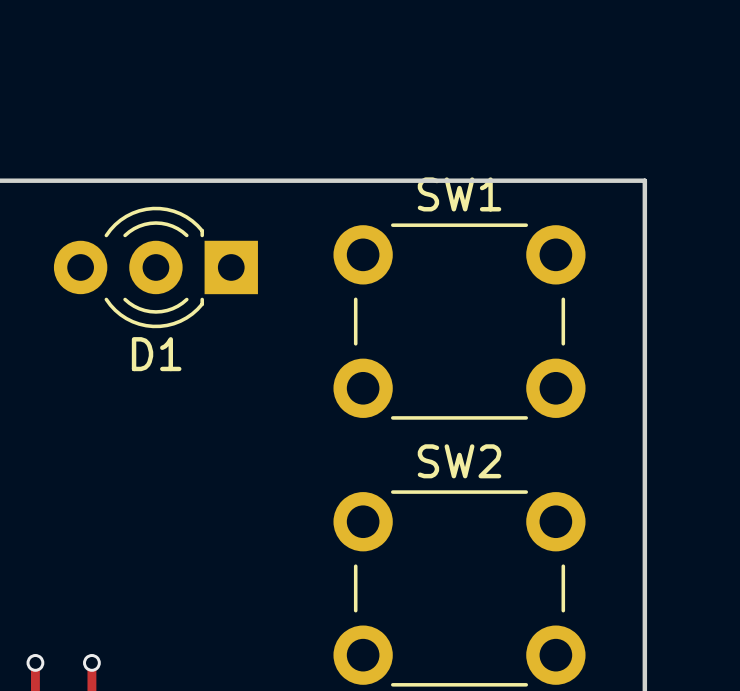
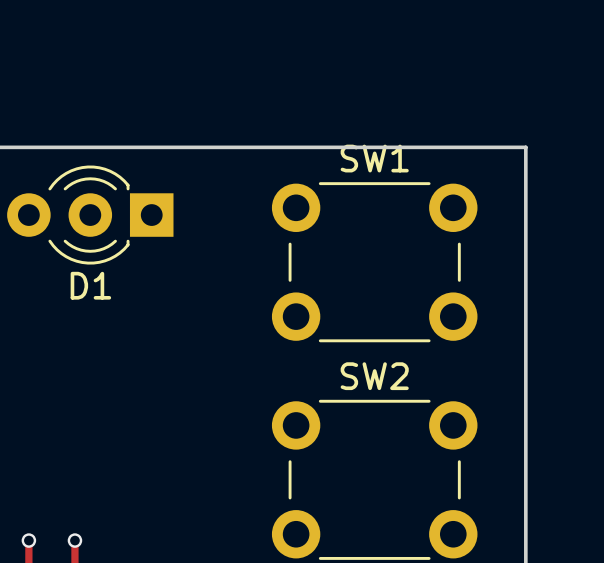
D1 position: (155, 267) -> (90, 215)

